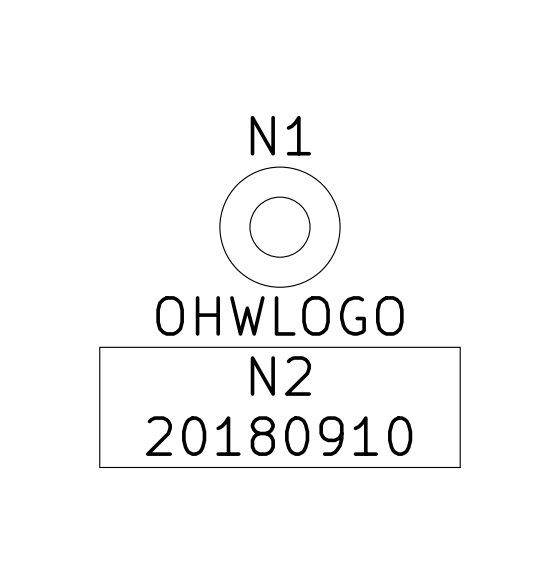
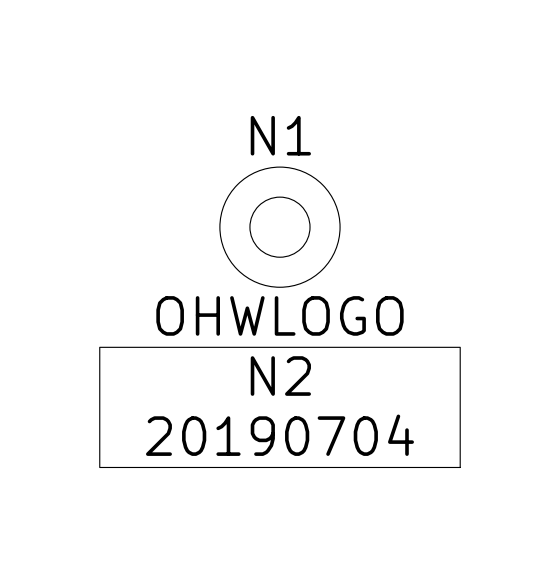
N2 value: 20180910 (279, 436) -> 20190704 (279, 435)

